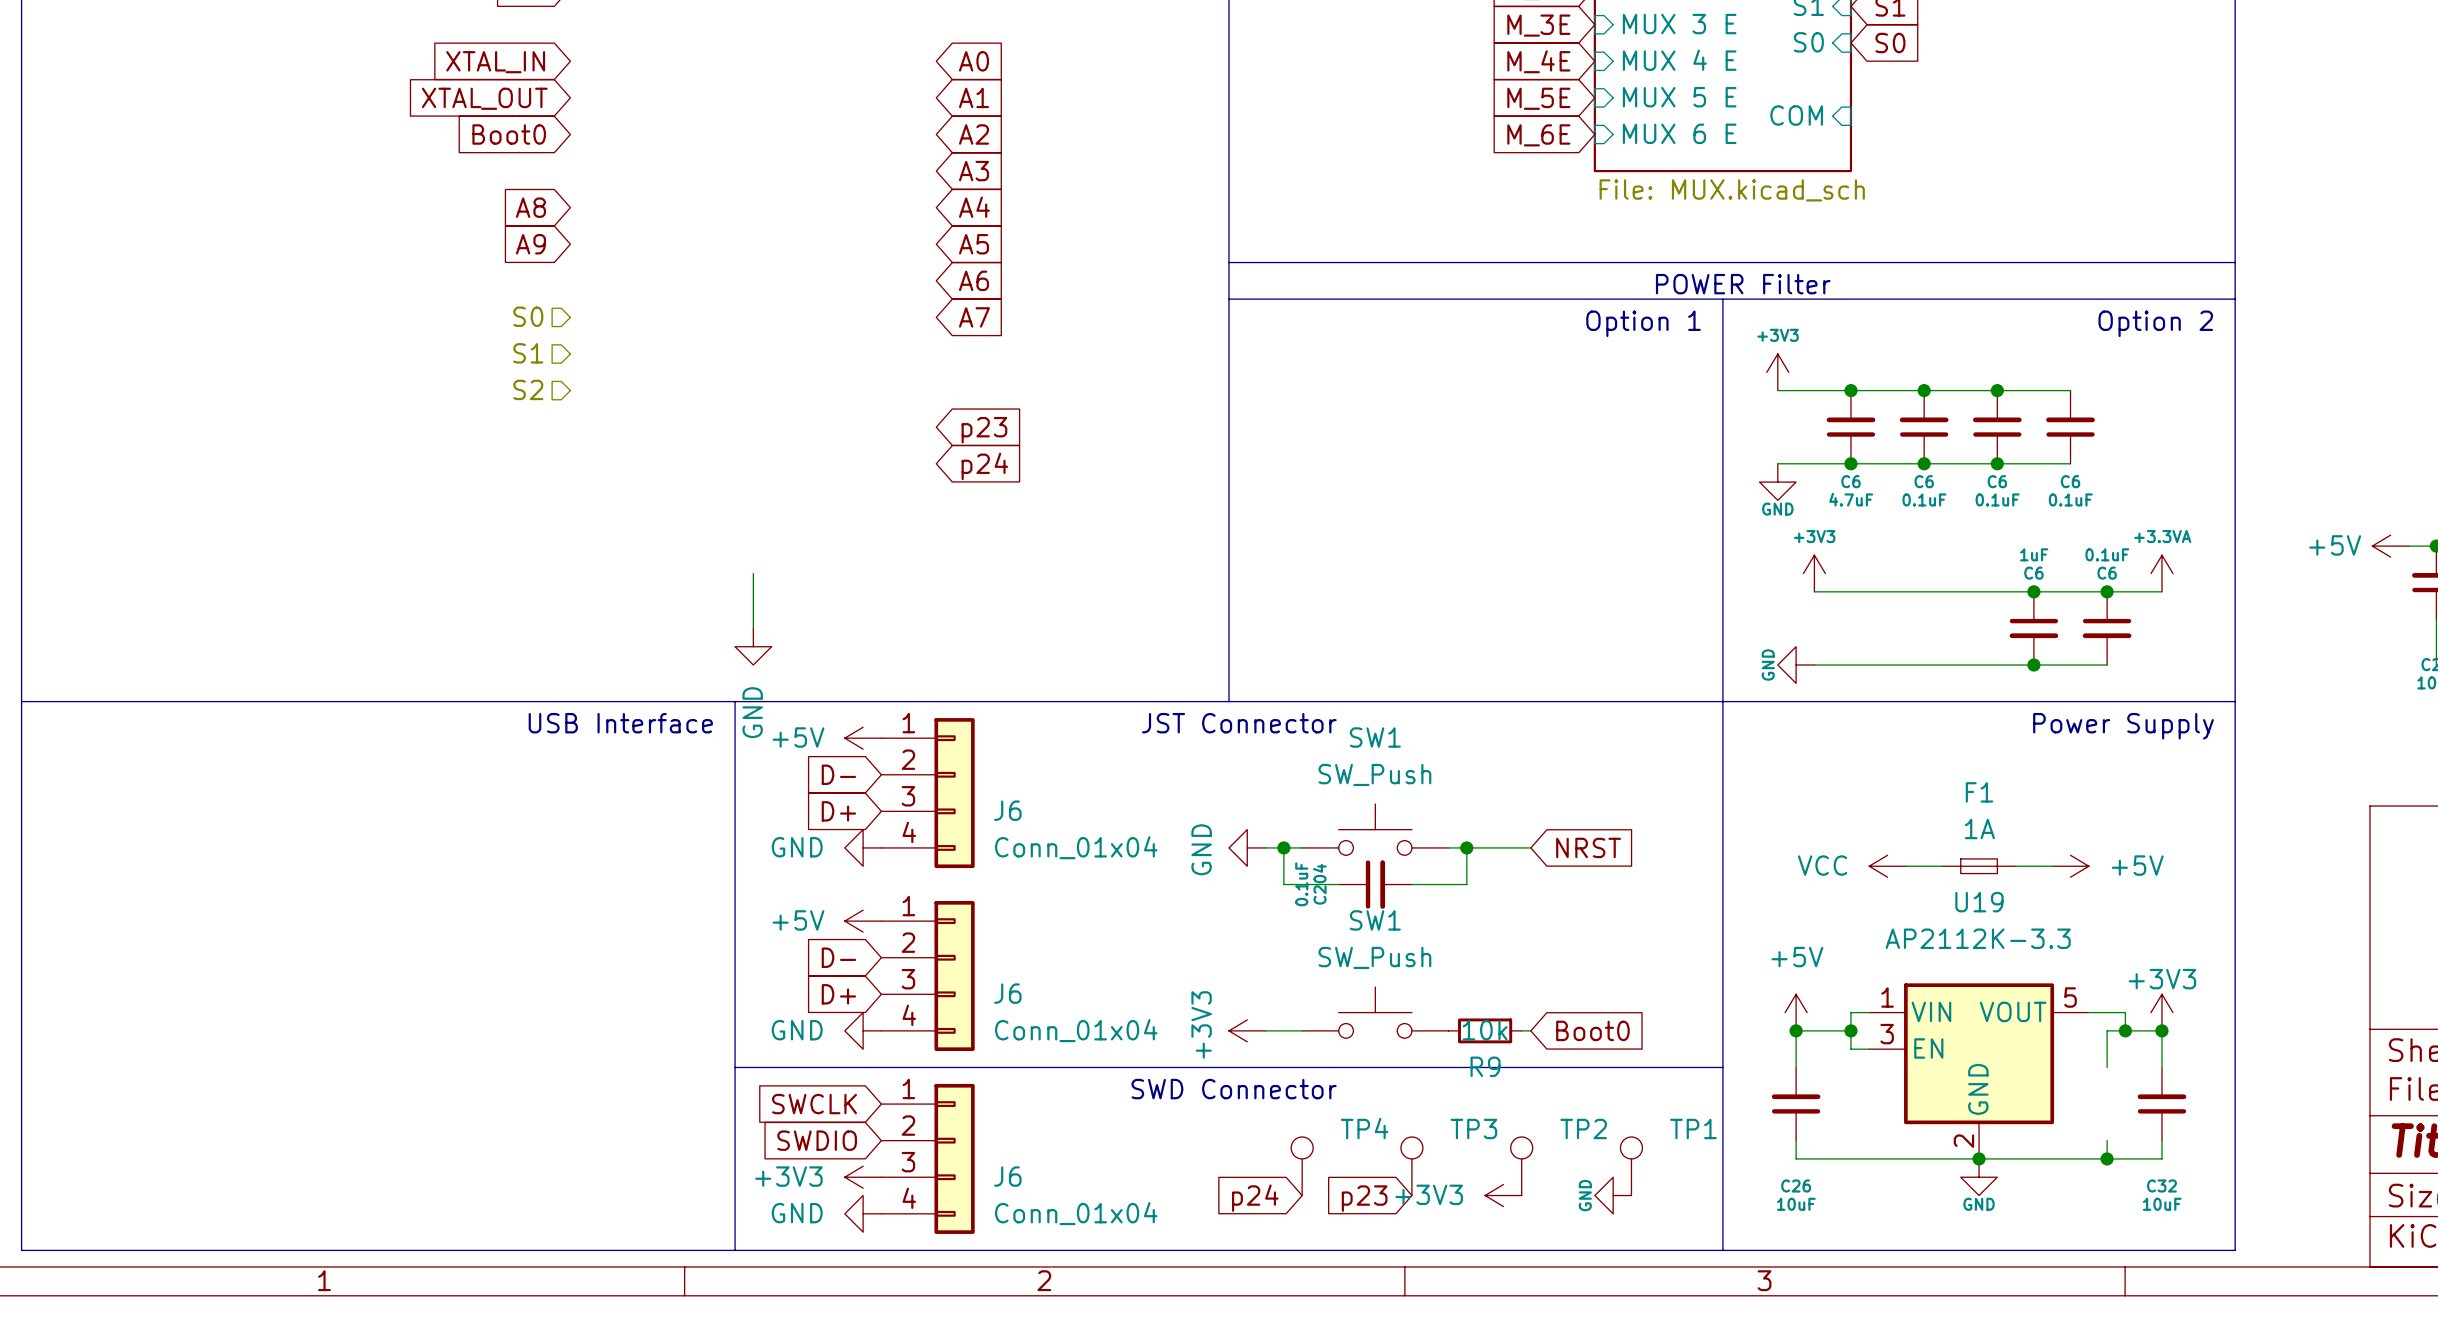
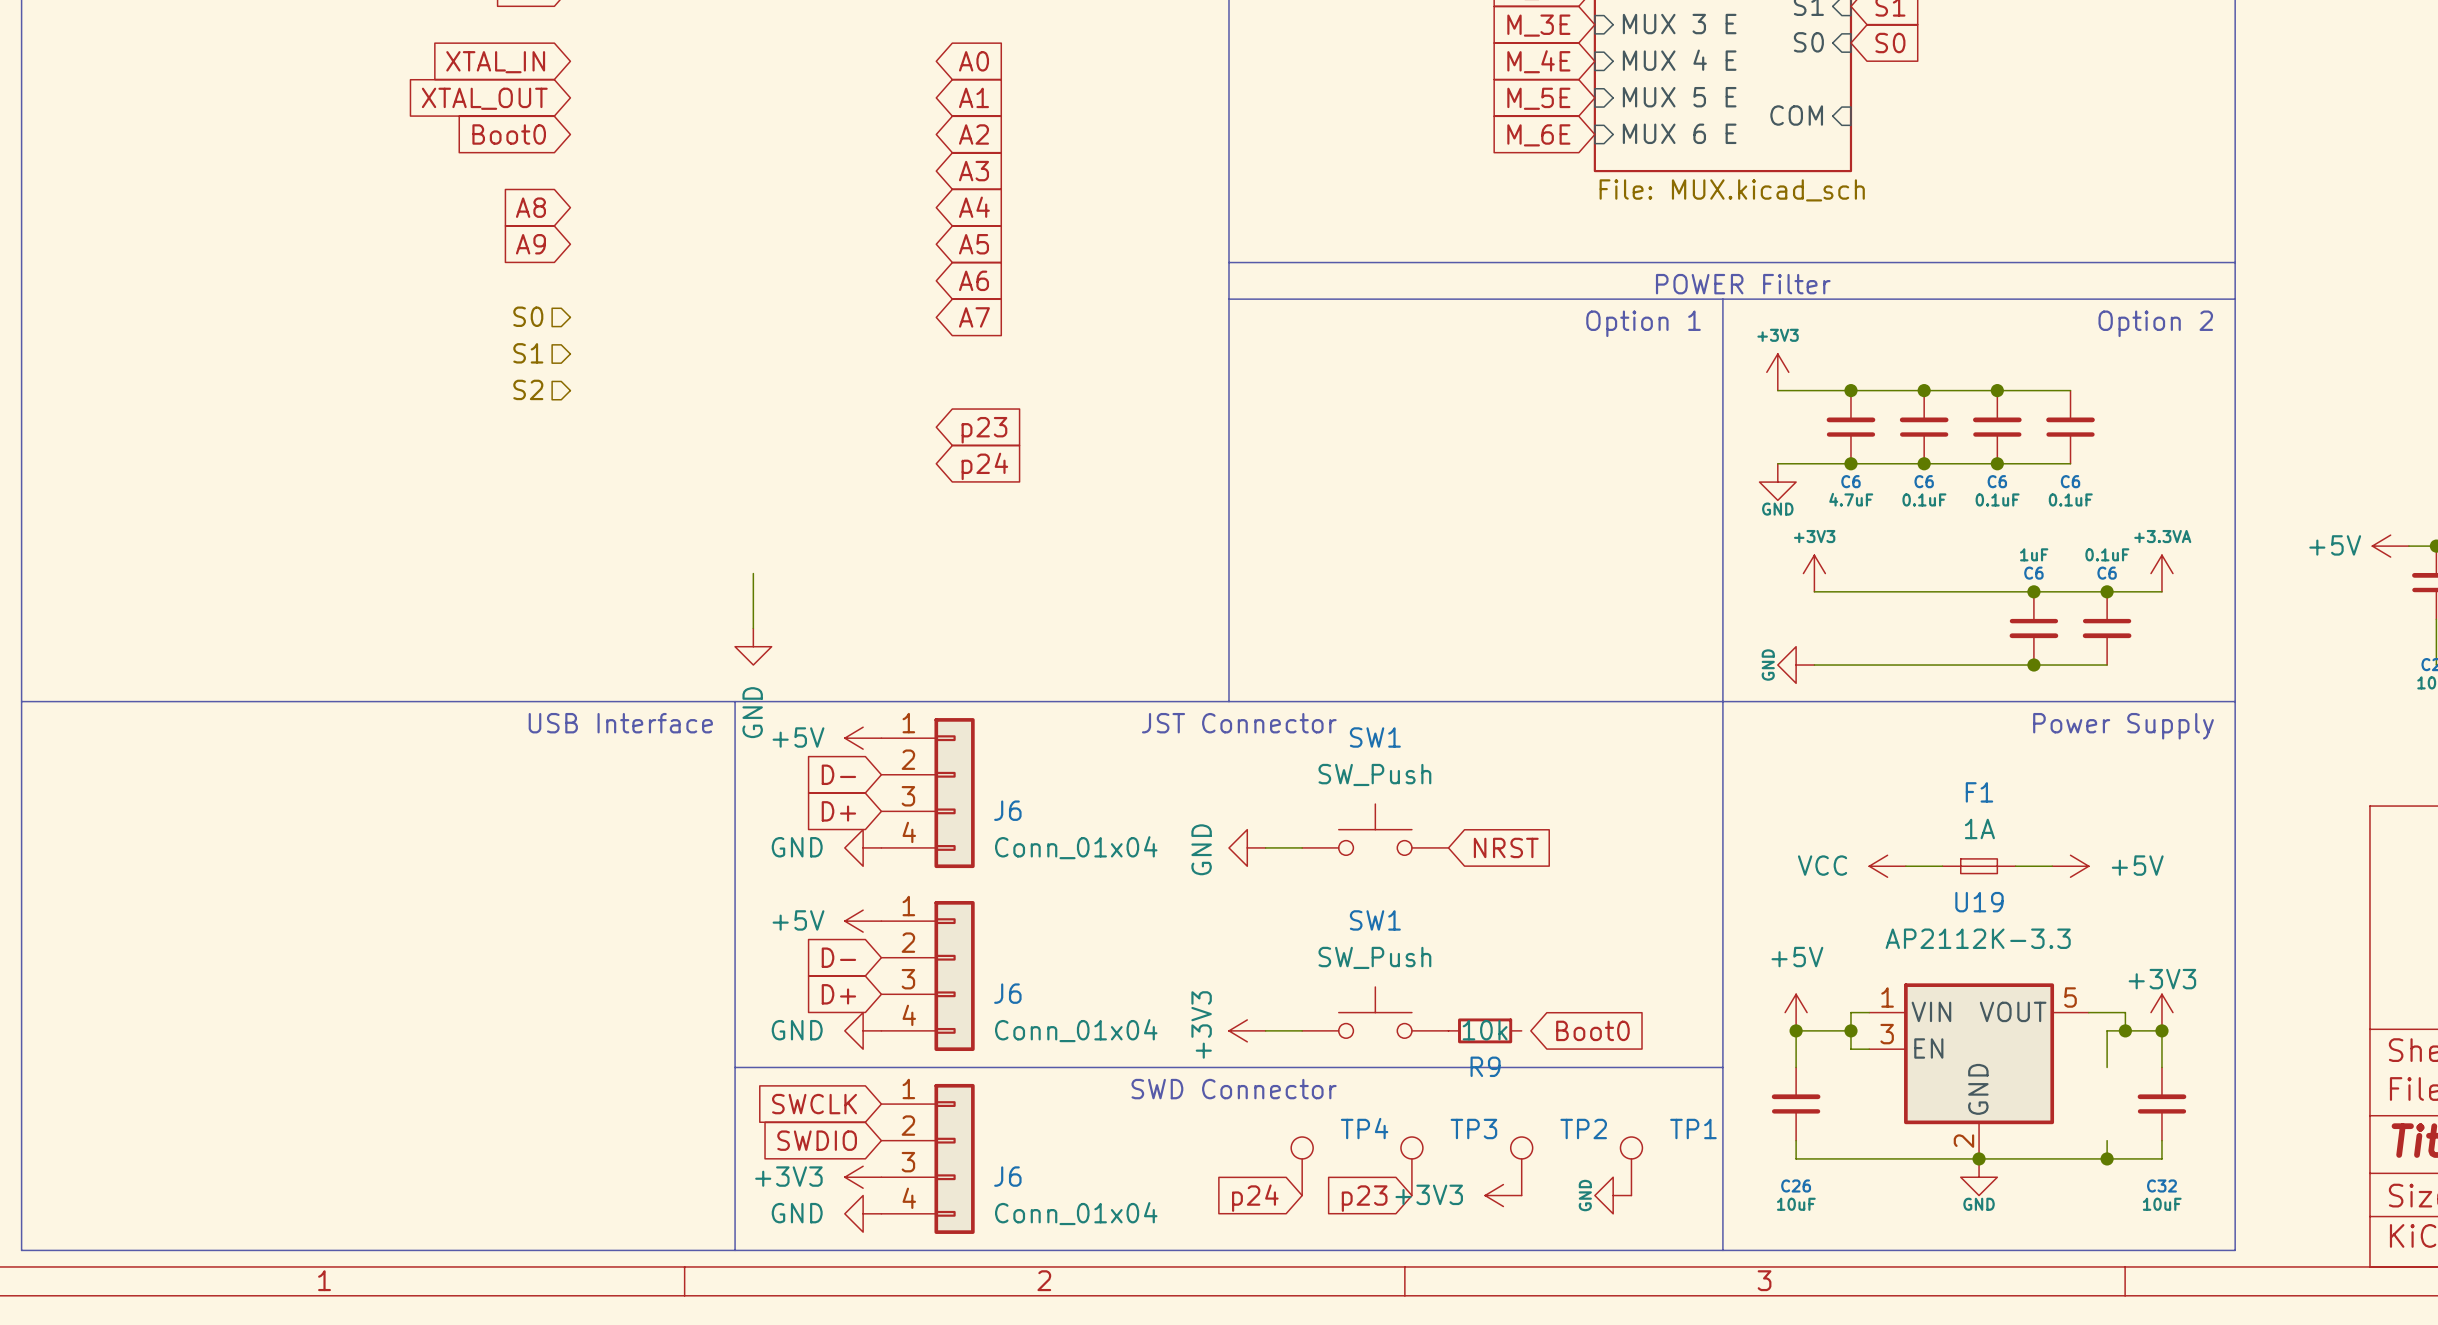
wire: (1283, 847) (1283, 884) (1338, 884) -> none
junction: (1283, 847) -> none
wire: (1448, 847) (1530, 847) -> none
wire: (1466, 847) (1466, 884) (1411, 884) -> none
junction: (1466, 847) -> none
global label position: NRST (1588, 847) -> NRST (1506, 847)
C204: 0.1uF (1375, 884) -> none
wire: (1521, 1030) (1530, 1030) -> none

